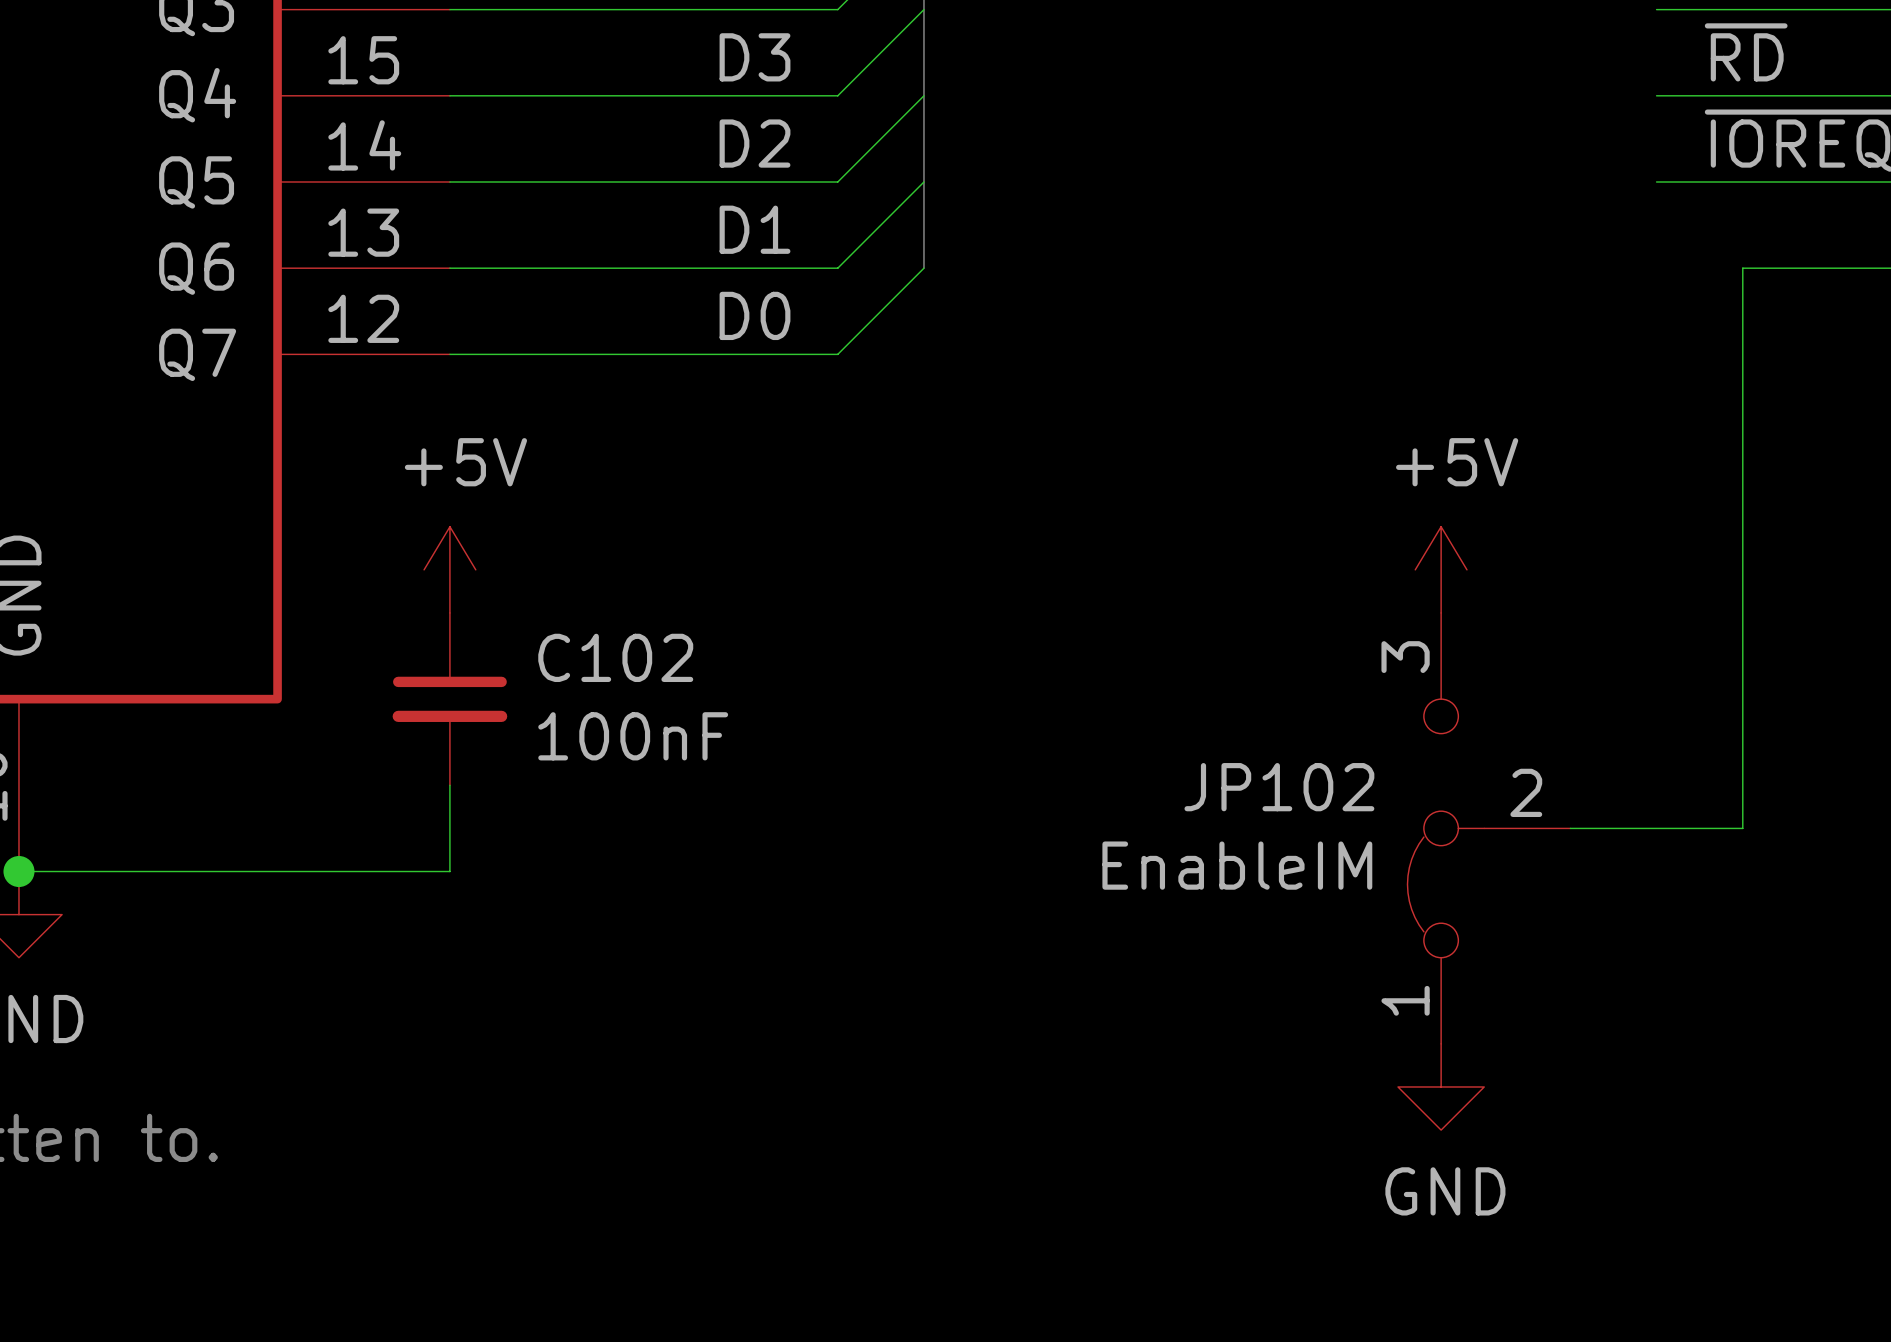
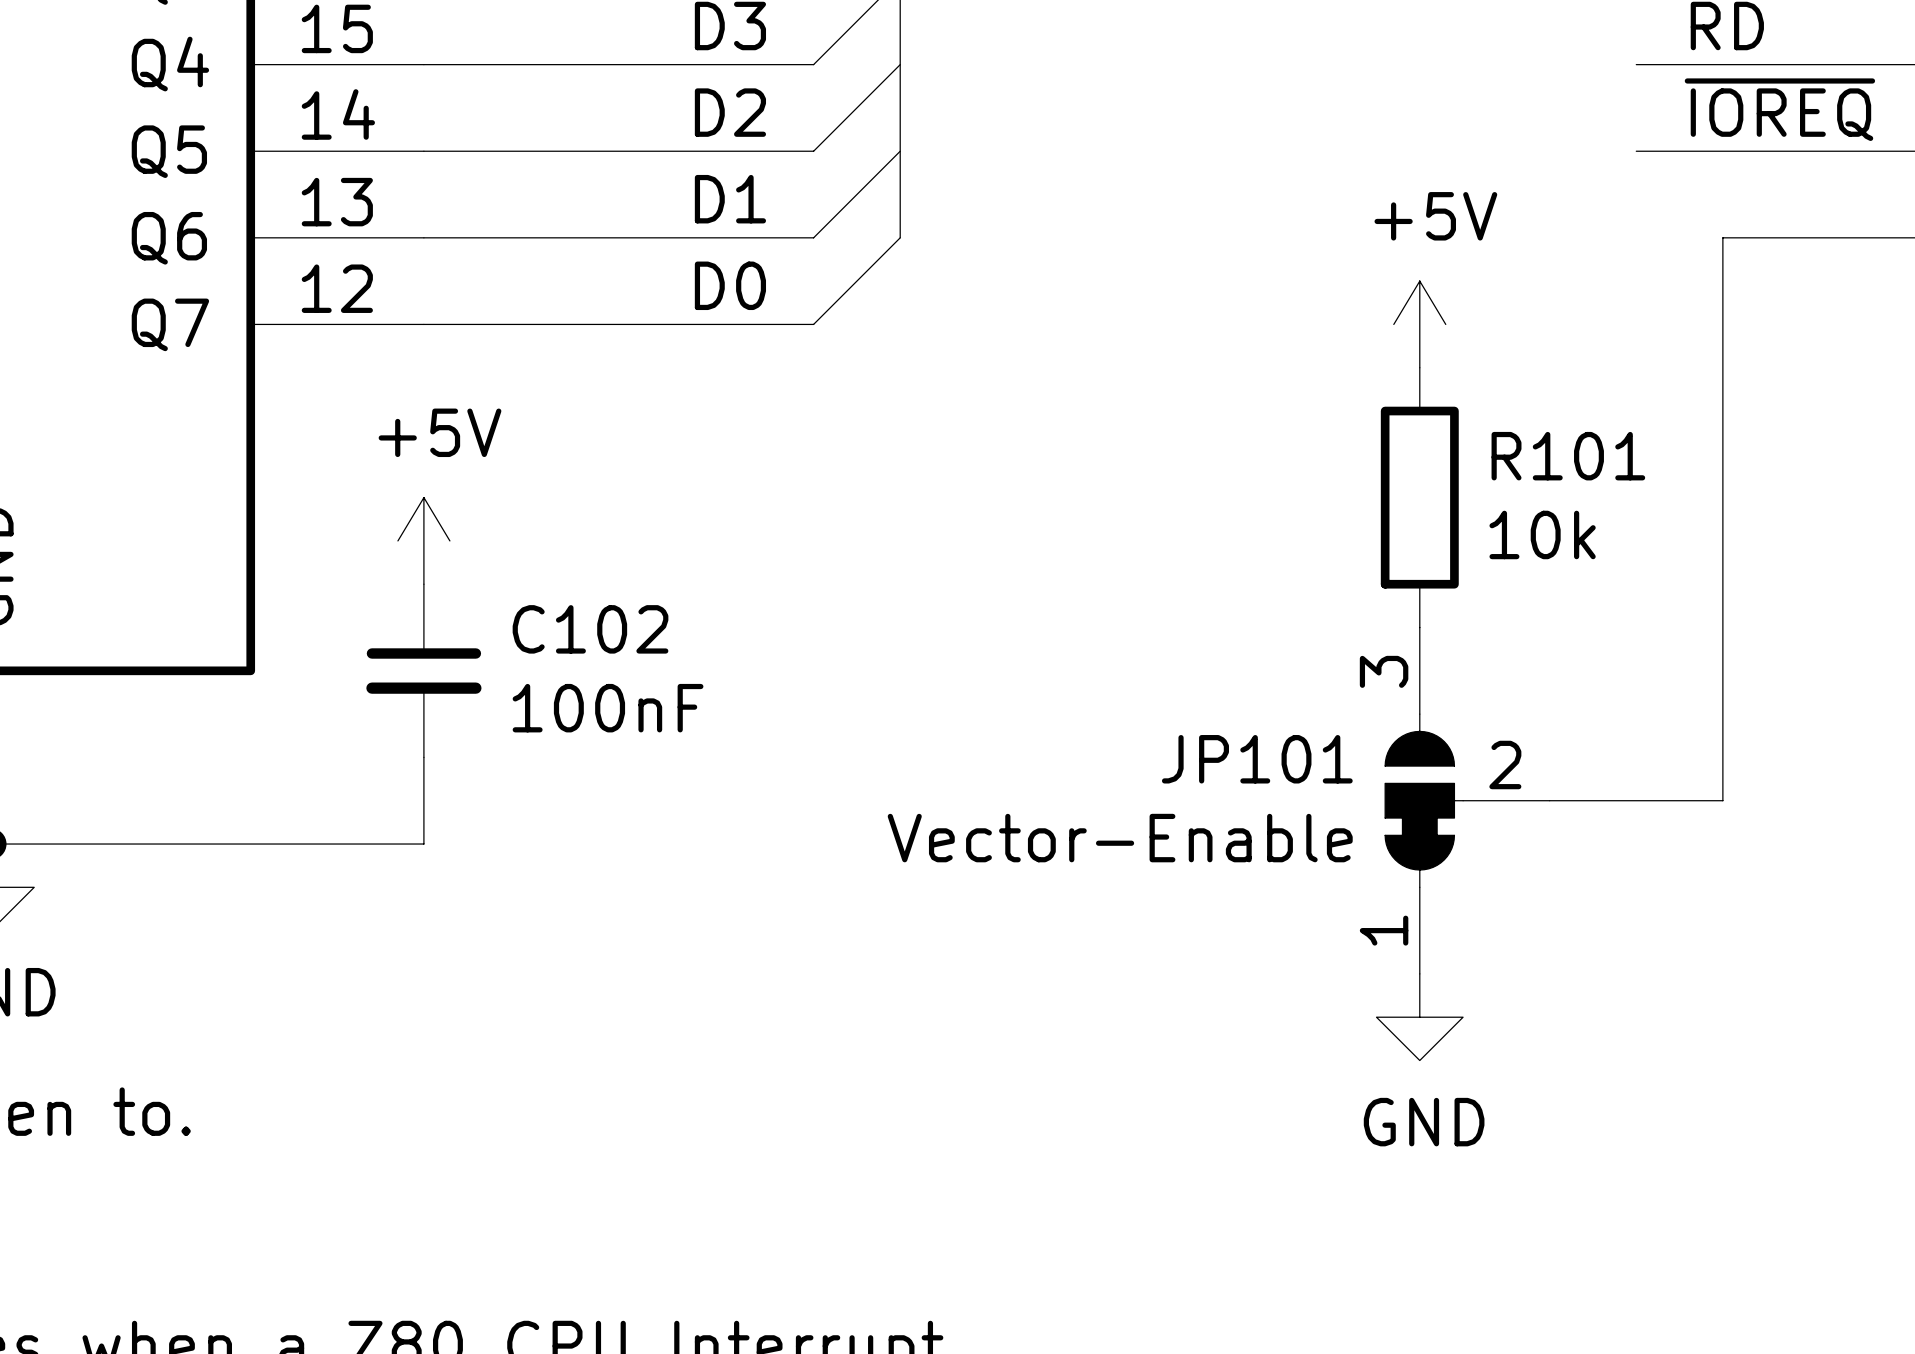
R101: none -> 10k (1419, 497)
power symbol position: +5V (1441, 569) -> +5V (1419, 324)
JP102: EnableIM (1488, 828) -> none
JP101: none -> Vector-Enable (1467, 800)
power symbol position: GND (1441, 1086) -> GND (1419, 1017)

